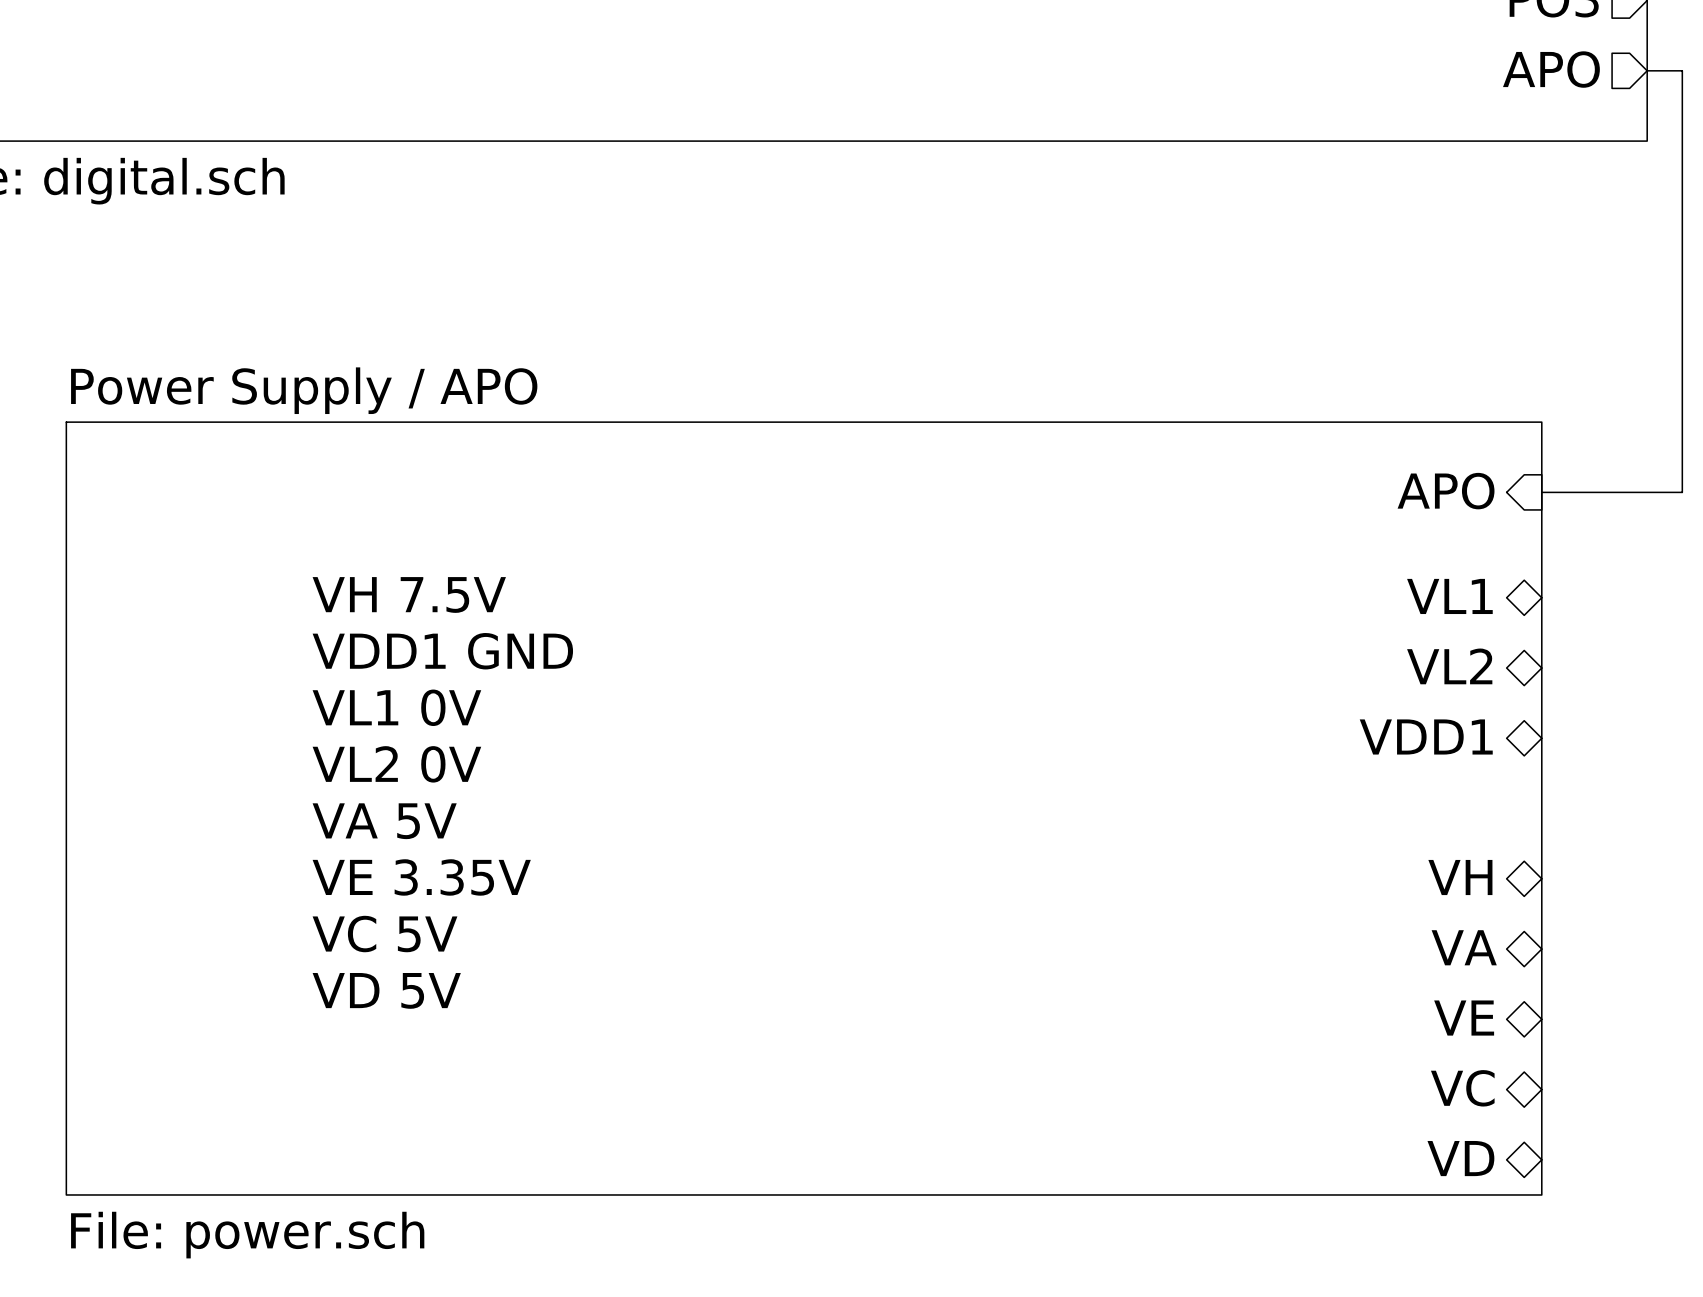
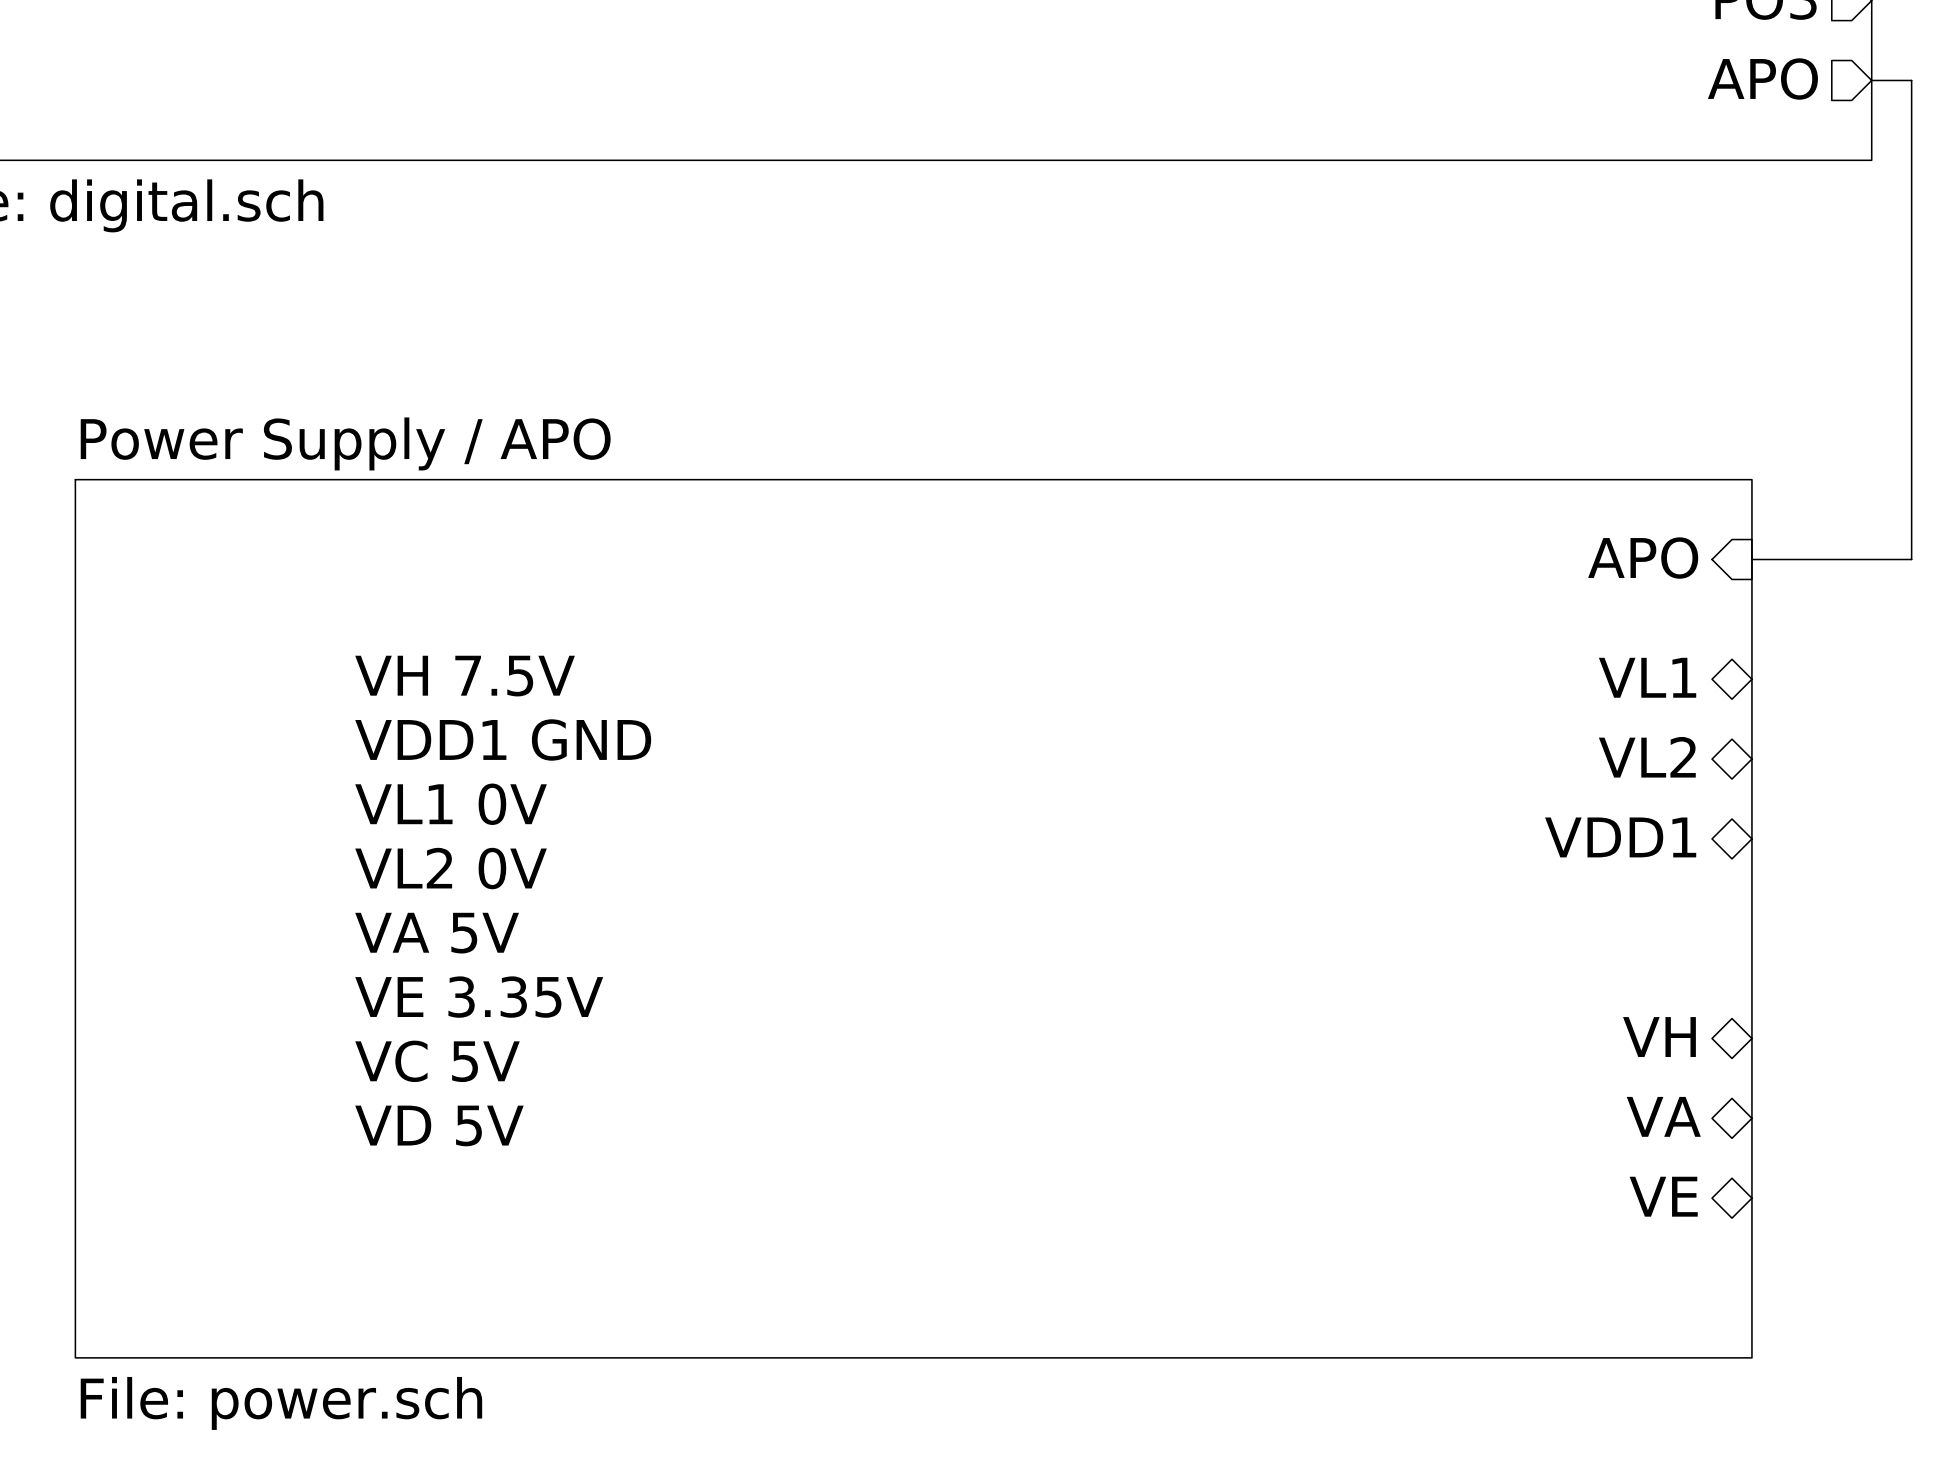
sheet pin position: VH (1460, 877) -> VH (1659, 1037)
sheet pin position: VA (1464, 947) -> VA (1663, 1116)
sheet pin position: VE (1464, 1018) -> VE (1663, 1196)
sheet pin: VC (1462, 1088) -> none
sheet pin: VD (1460, 1158) -> none

